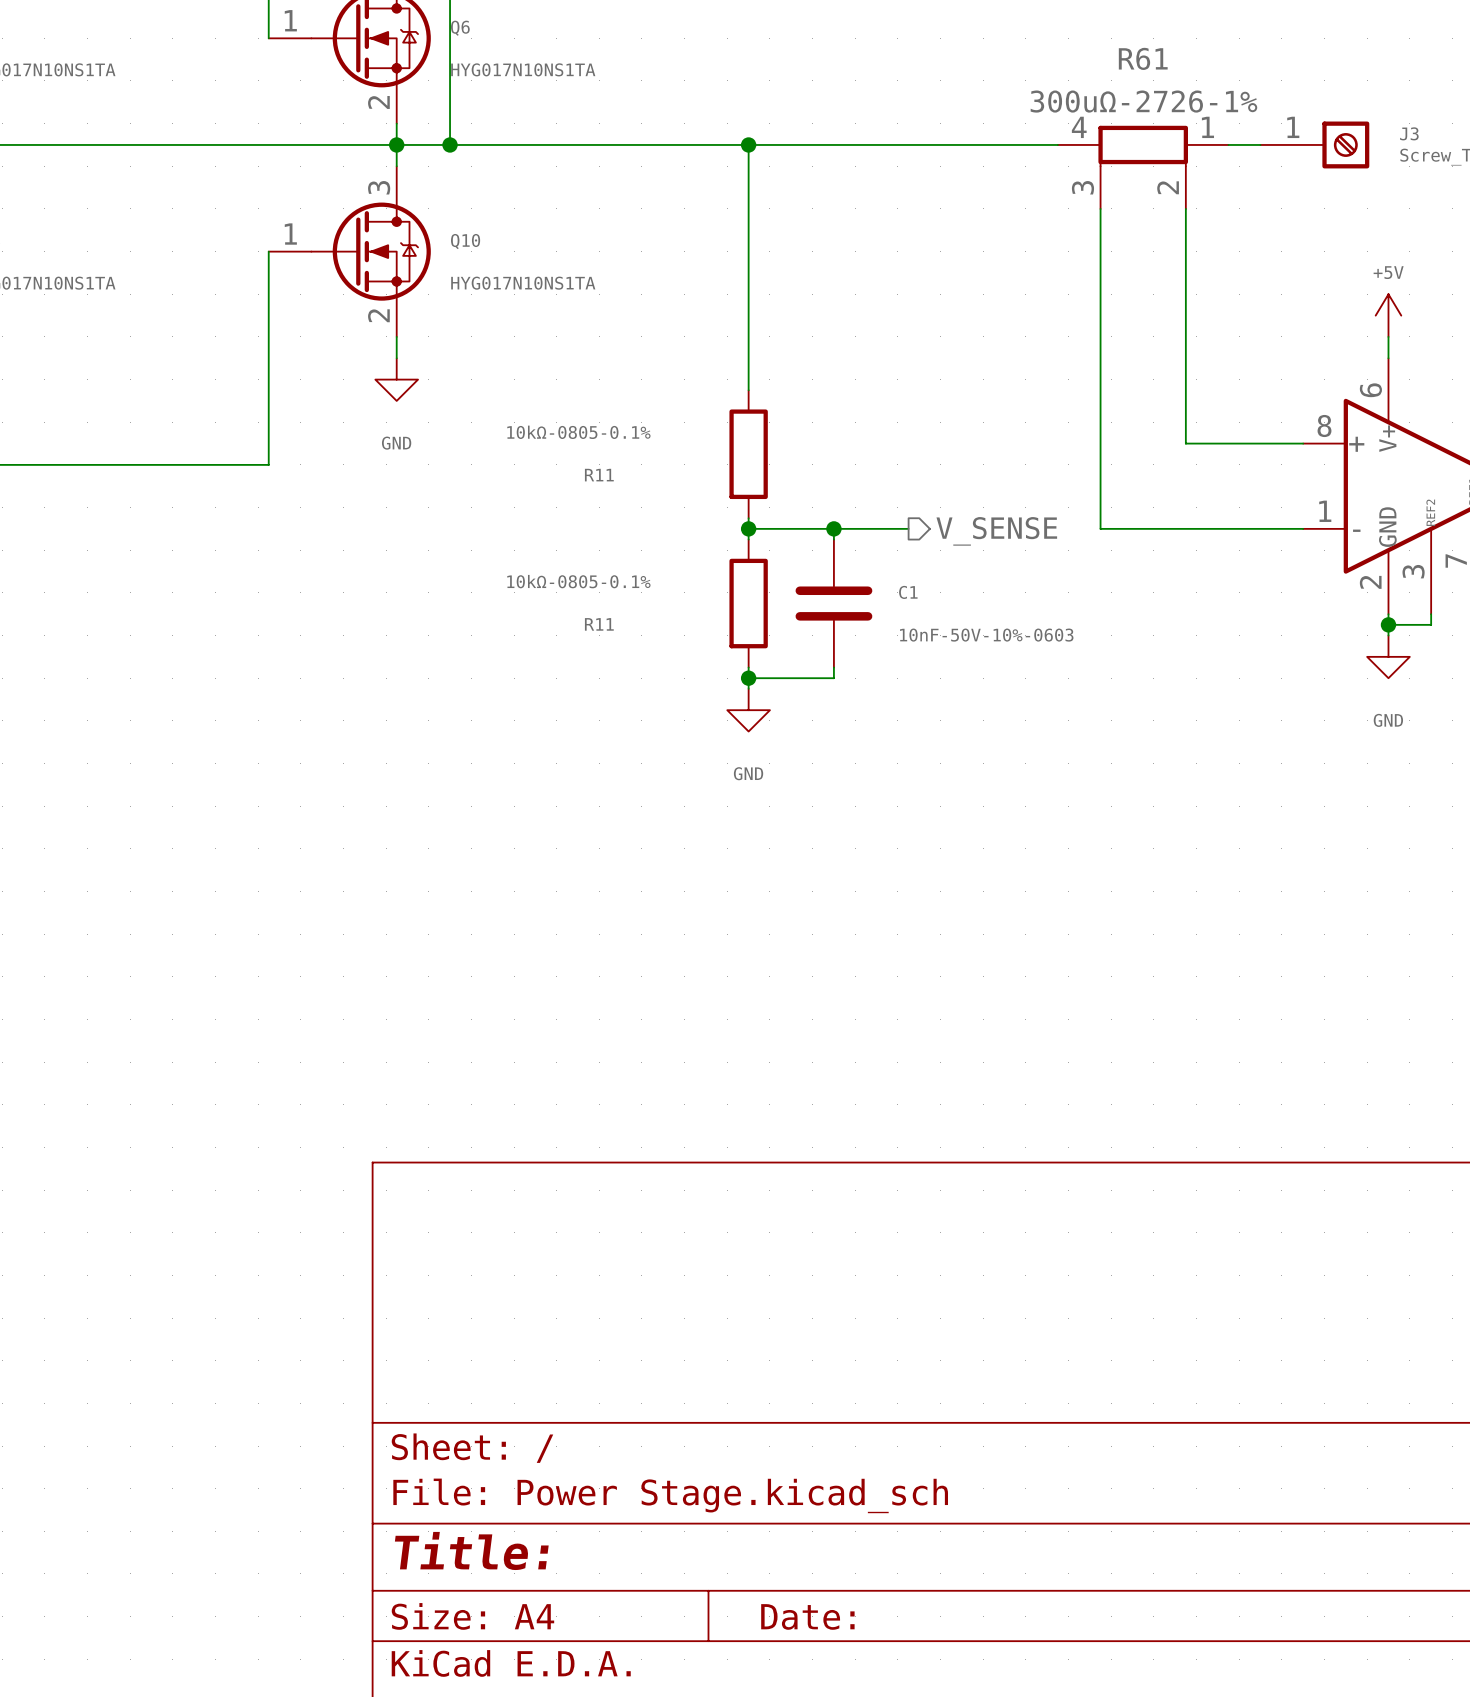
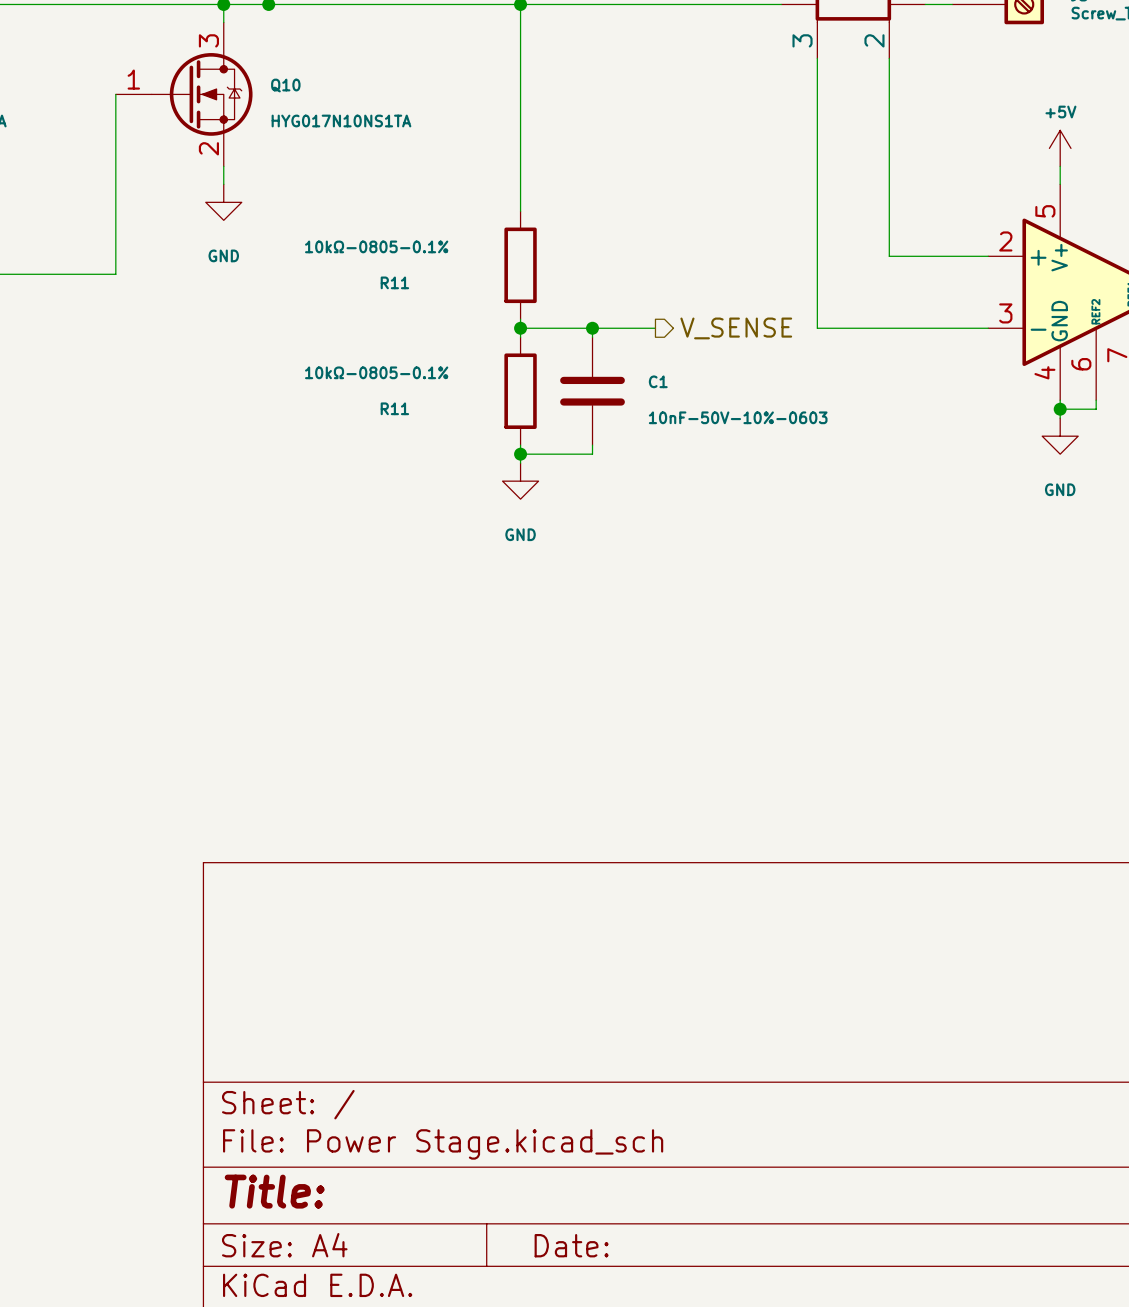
part pin number: 6 (1370, 390) -> 5 (1045, 211)
part pin number: 8 (1324, 426) -> 2 (1005, 241)
part pin number: 1 (1325, 511) -> 3 (1005, 313)
part pin number: 3 (1413, 571) -> 6 (1081, 364)
part pin number: 2 (1370, 582) -> 4 (1044, 372)

